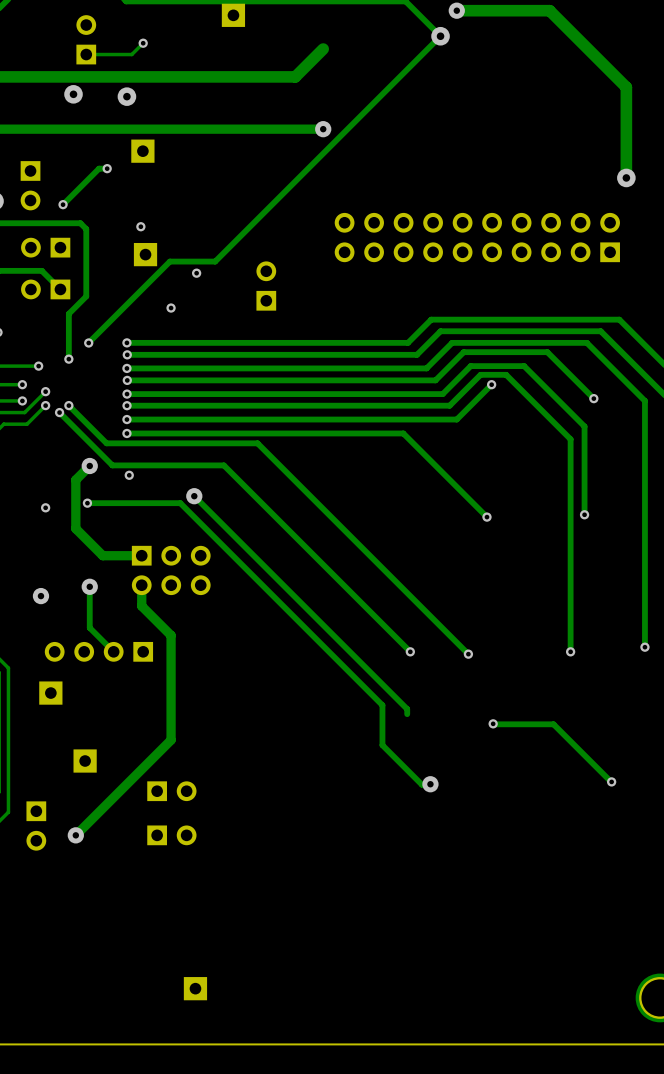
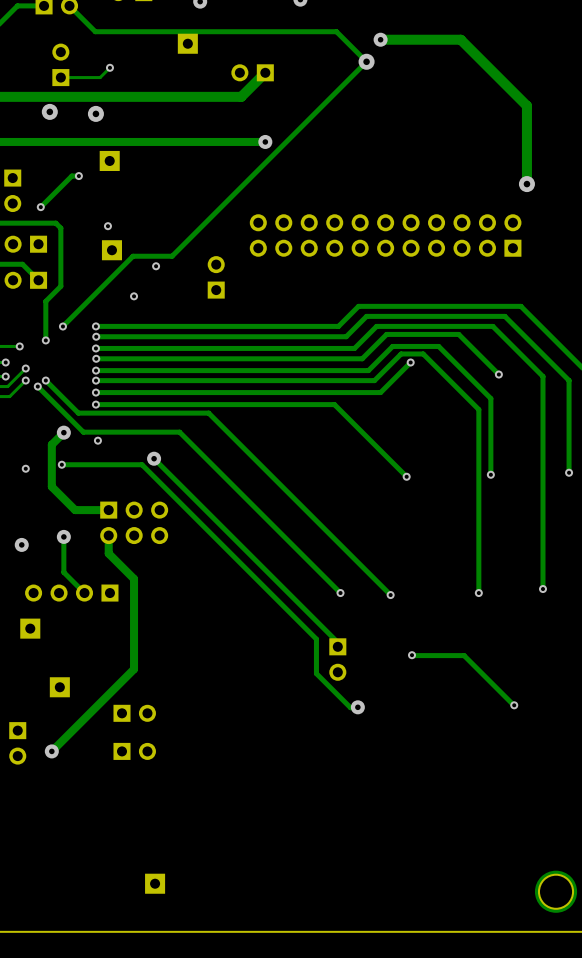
part: none -> (252, 72)
part: none -> (385, 235)
part: none -> (337, 659)

